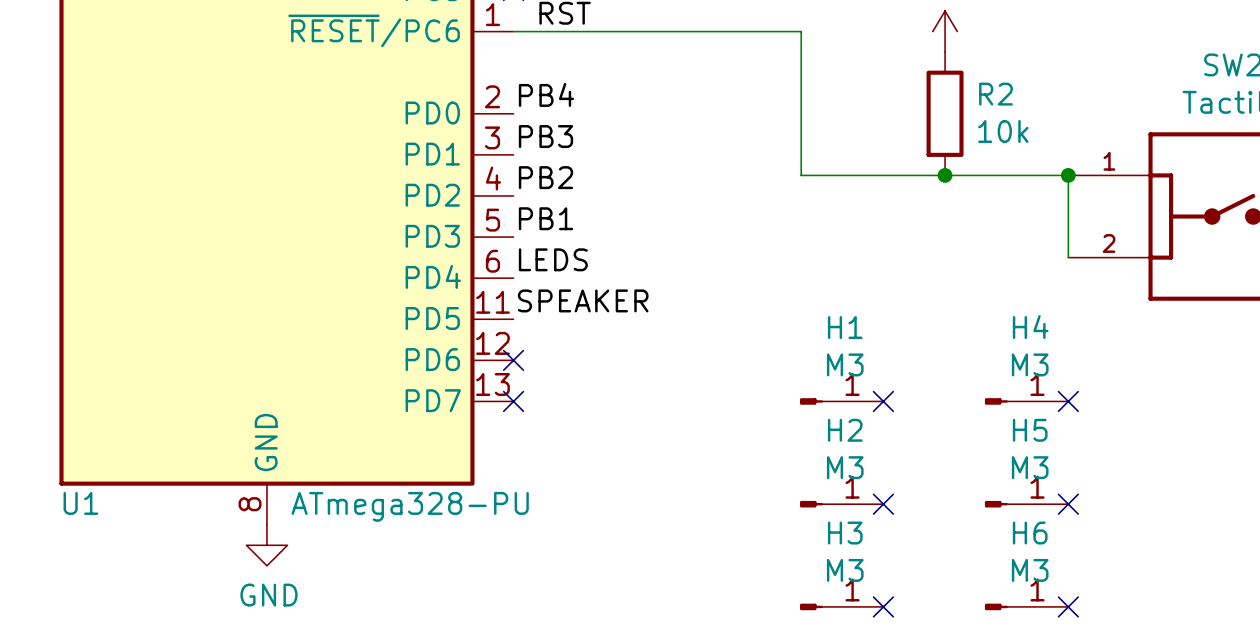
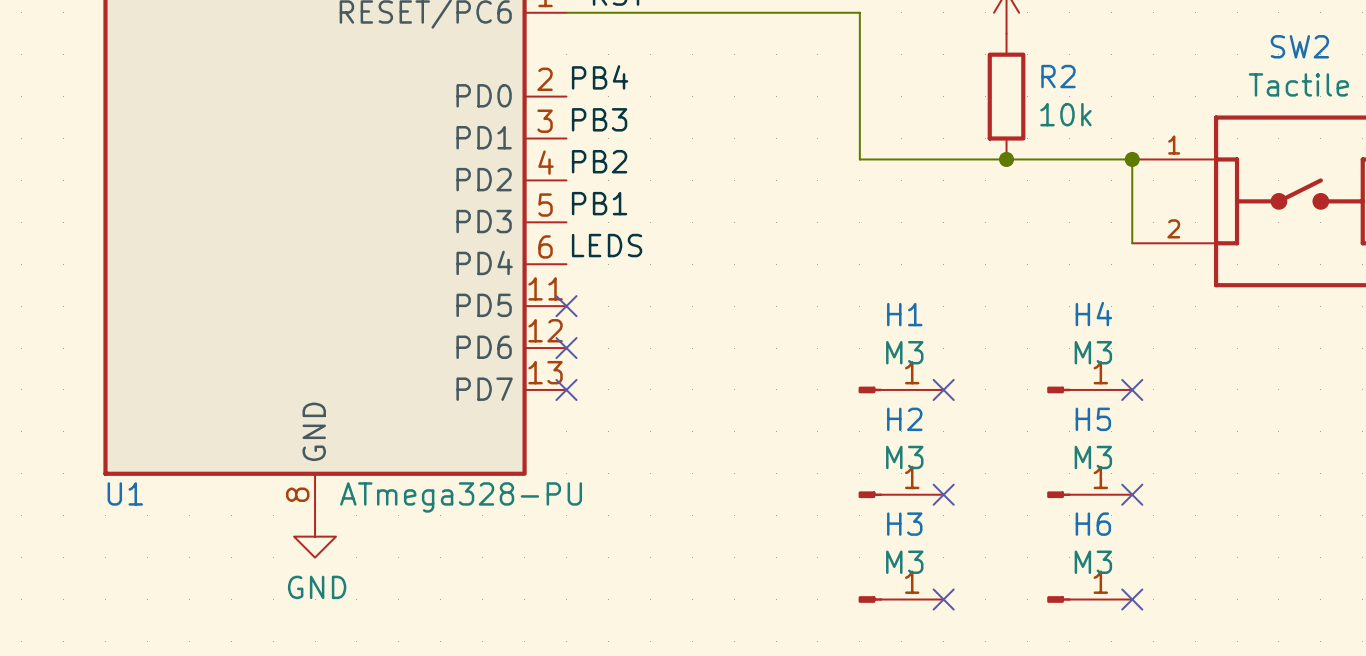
label: SPEAKER (583, 300) -> none
no-connect mark: none -> (566, 306)

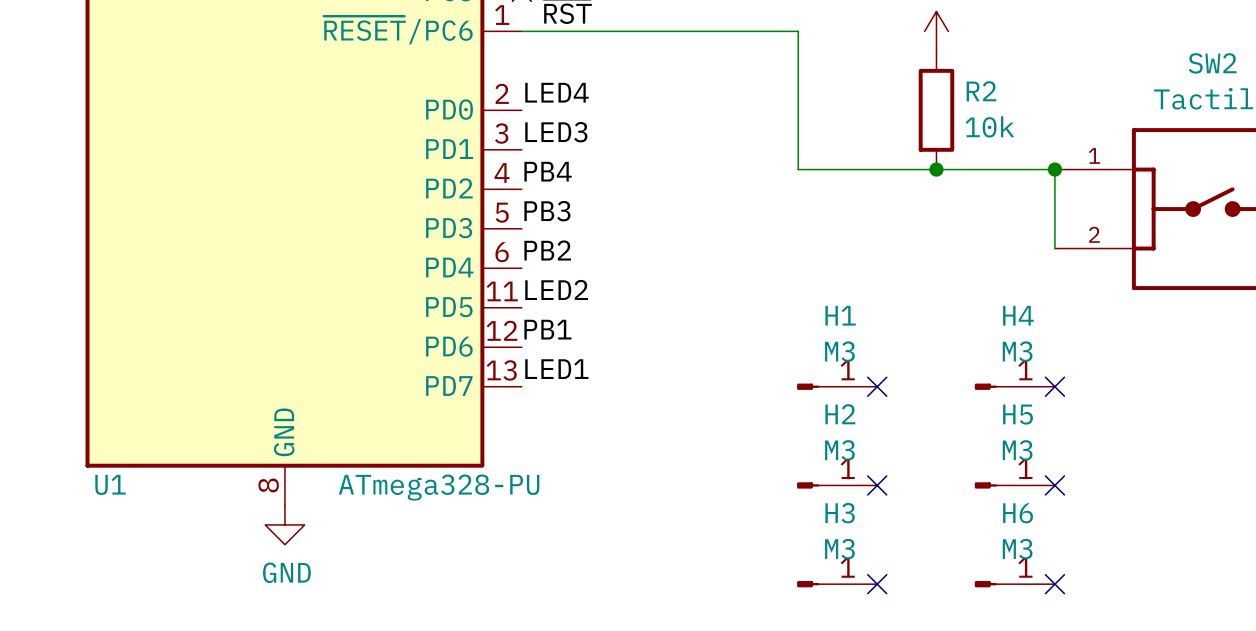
label: PB4 (600, 77) -> LED4 (556, 92)
label: PB3 (599, 119) -> LED3 (556, 132)
label: PB2 (599, 161) -> PB4 (548, 171)
label: PB1 (599, 203) -> PB3 (547, 211)
label: LEDS (607, 245) -> PB2 (547, 250)
label: none -> LED2 (556, 289)
no-connect mark: (566, 306) -> none
label: none -> PB1 (547, 329)
no-connect mark: (566, 348) -> none
label: none -> LED1 (556, 369)
no-connect mark: (566, 389) -> none

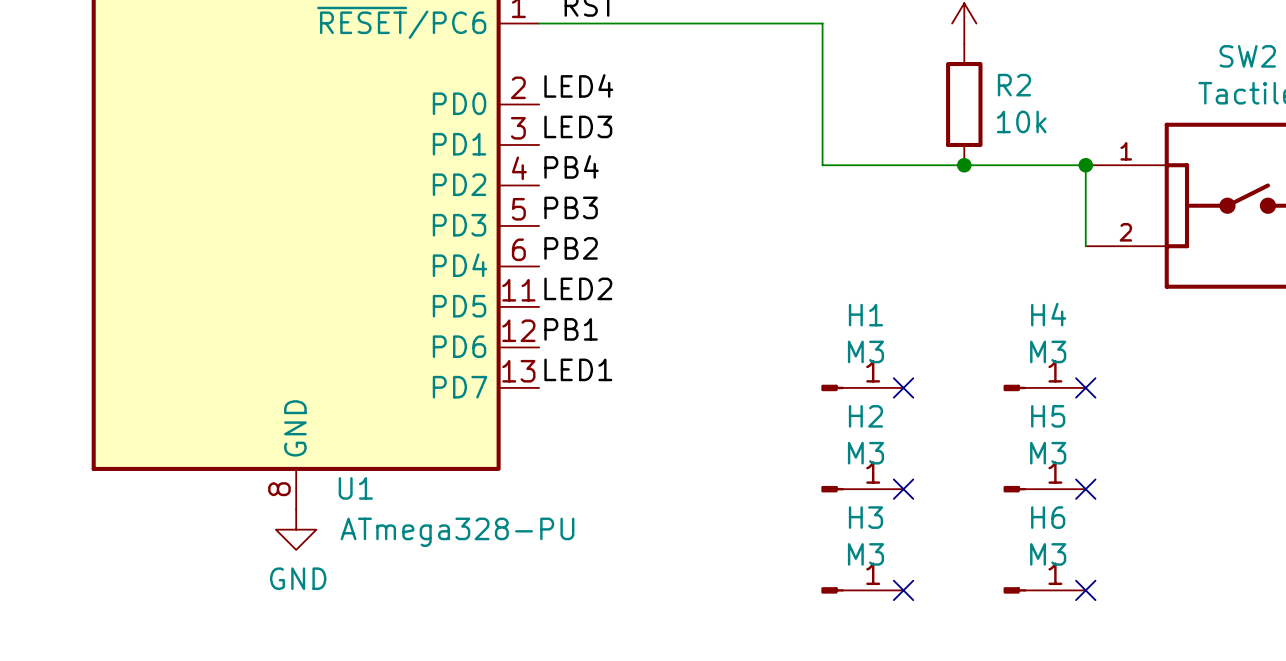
U1 name position: U1 (110, 484) -> U1 (355, 488)
U1 value position: ATmega328-PU (439, 487) -> ATmega328-PU (457, 532)

